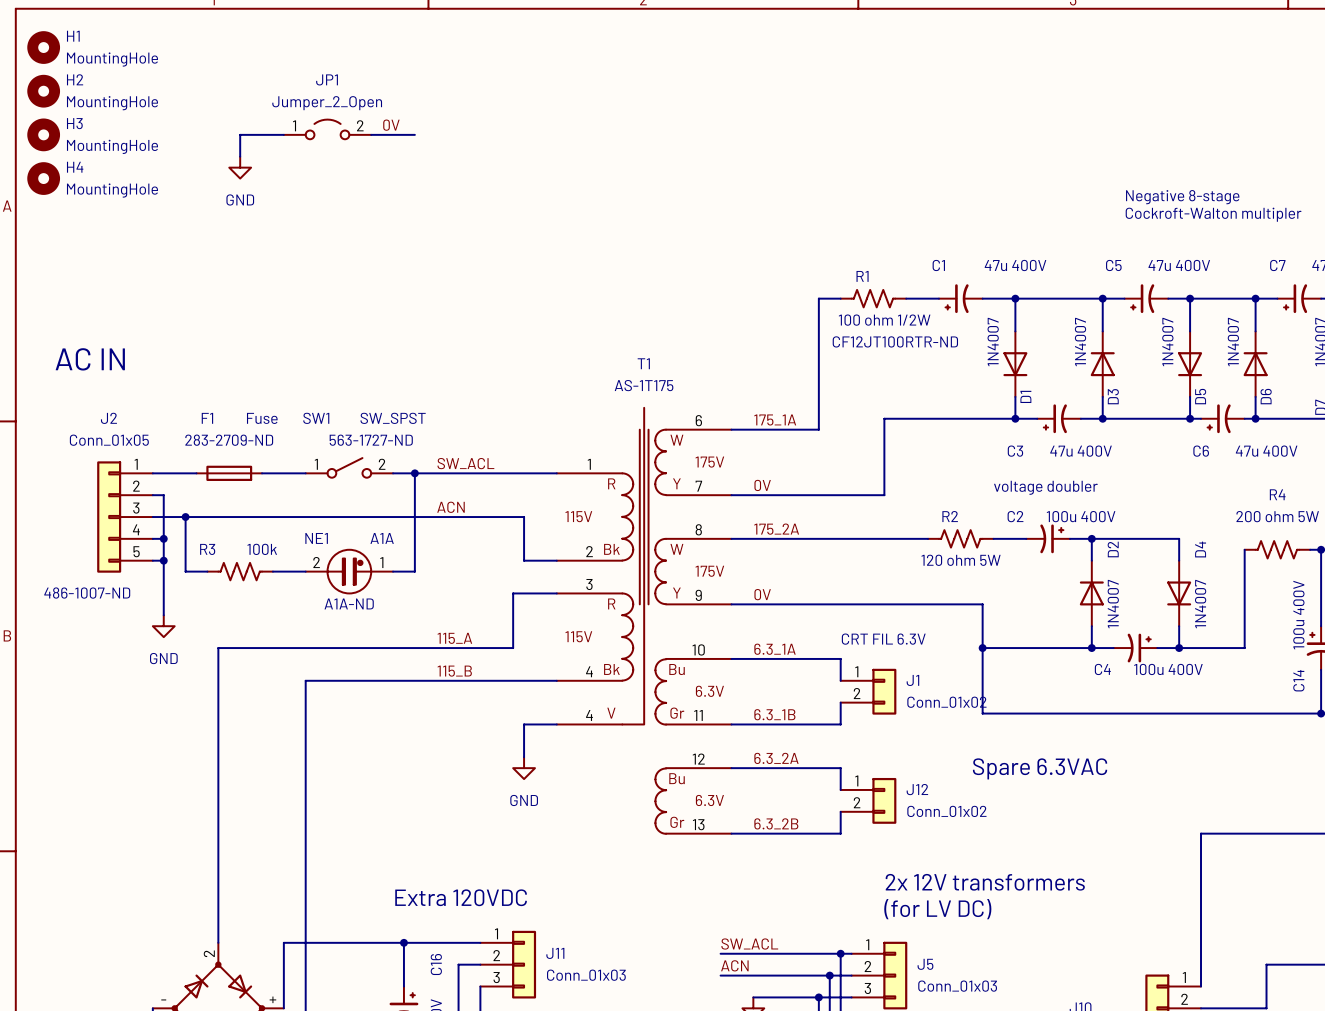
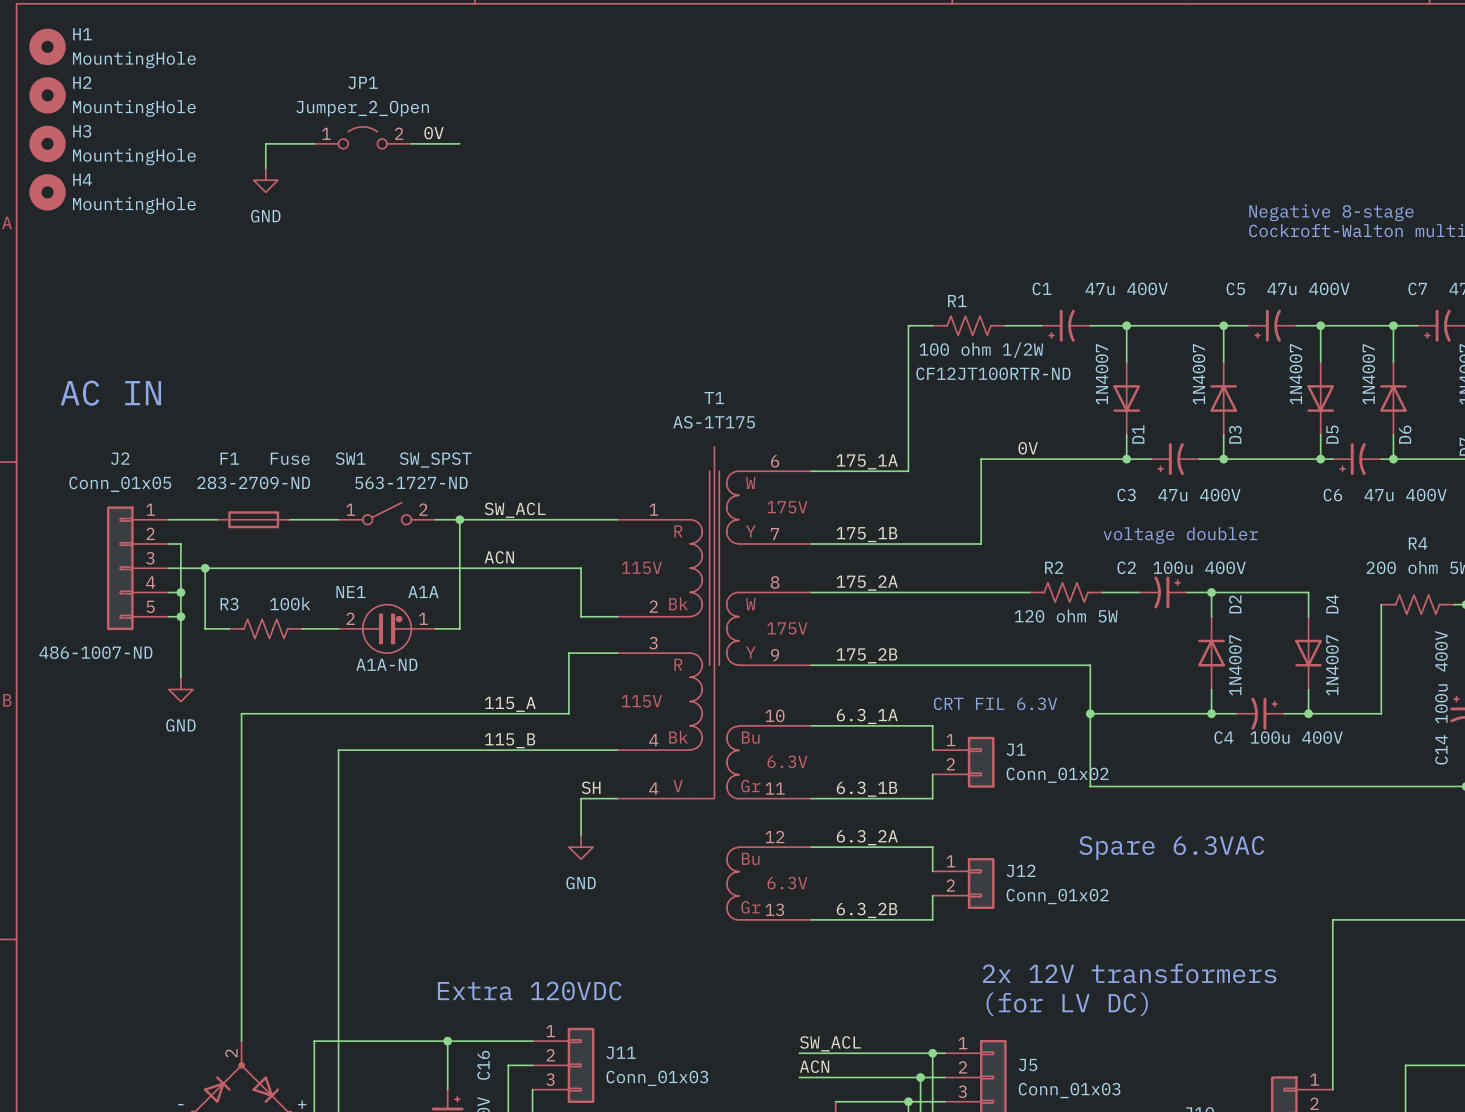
label: none -> 0V (1028, 448)
label: 0V (762, 485) -> 175_1B (866, 534)
label: 0V (762, 594) -> 175_2B (866, 655)
label: none -> SH (591, 787)

